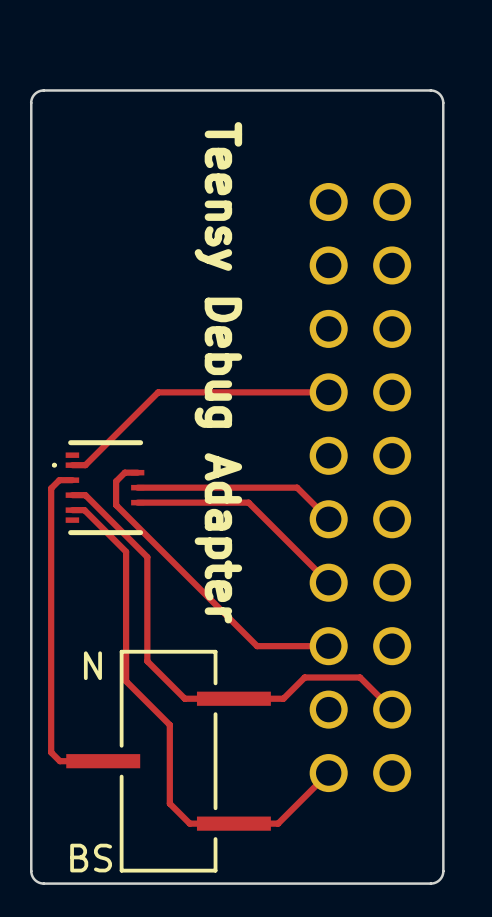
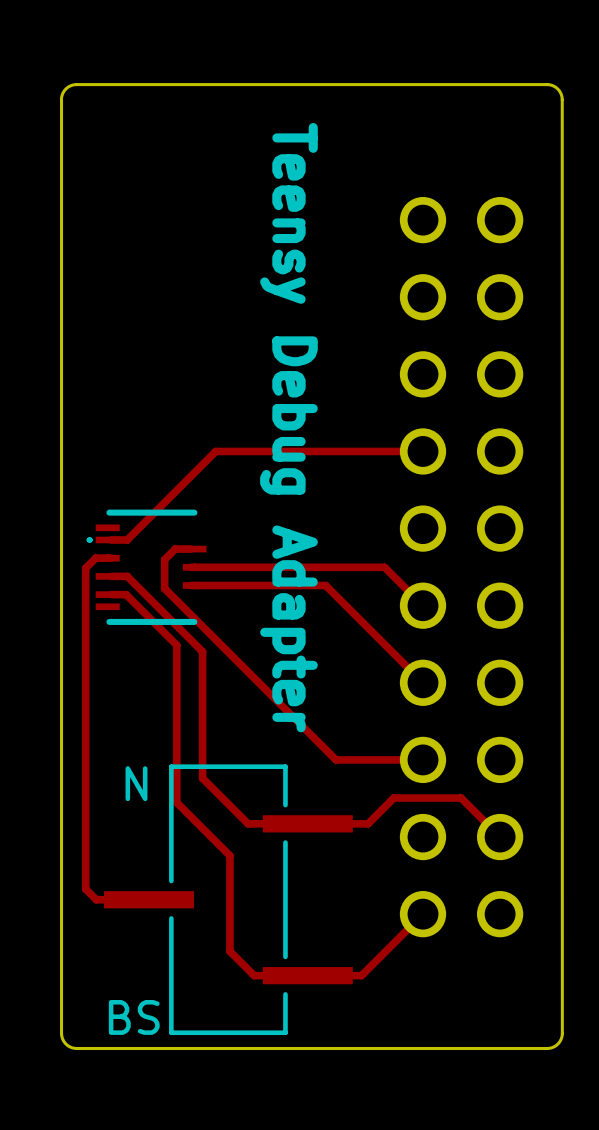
part footprint: [51, 440, 145, 536] -> [86, 509, 207, 625]

